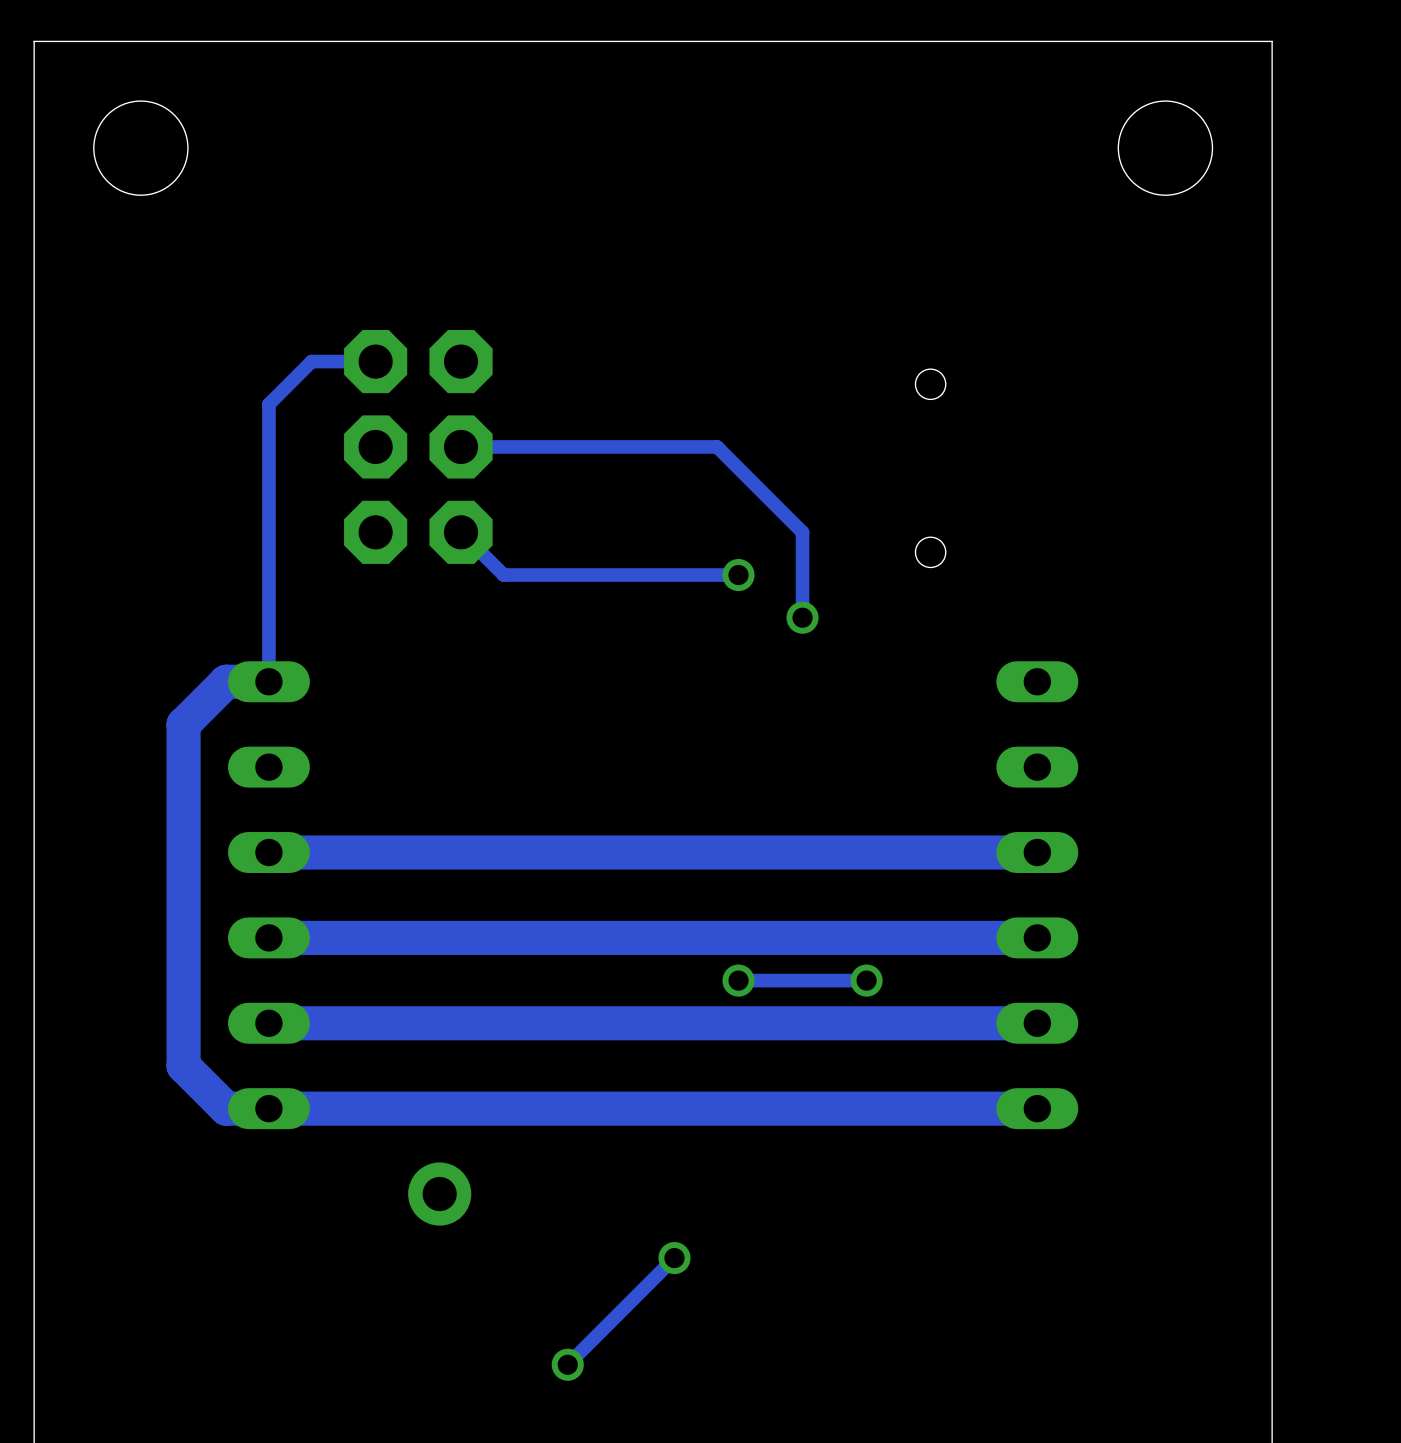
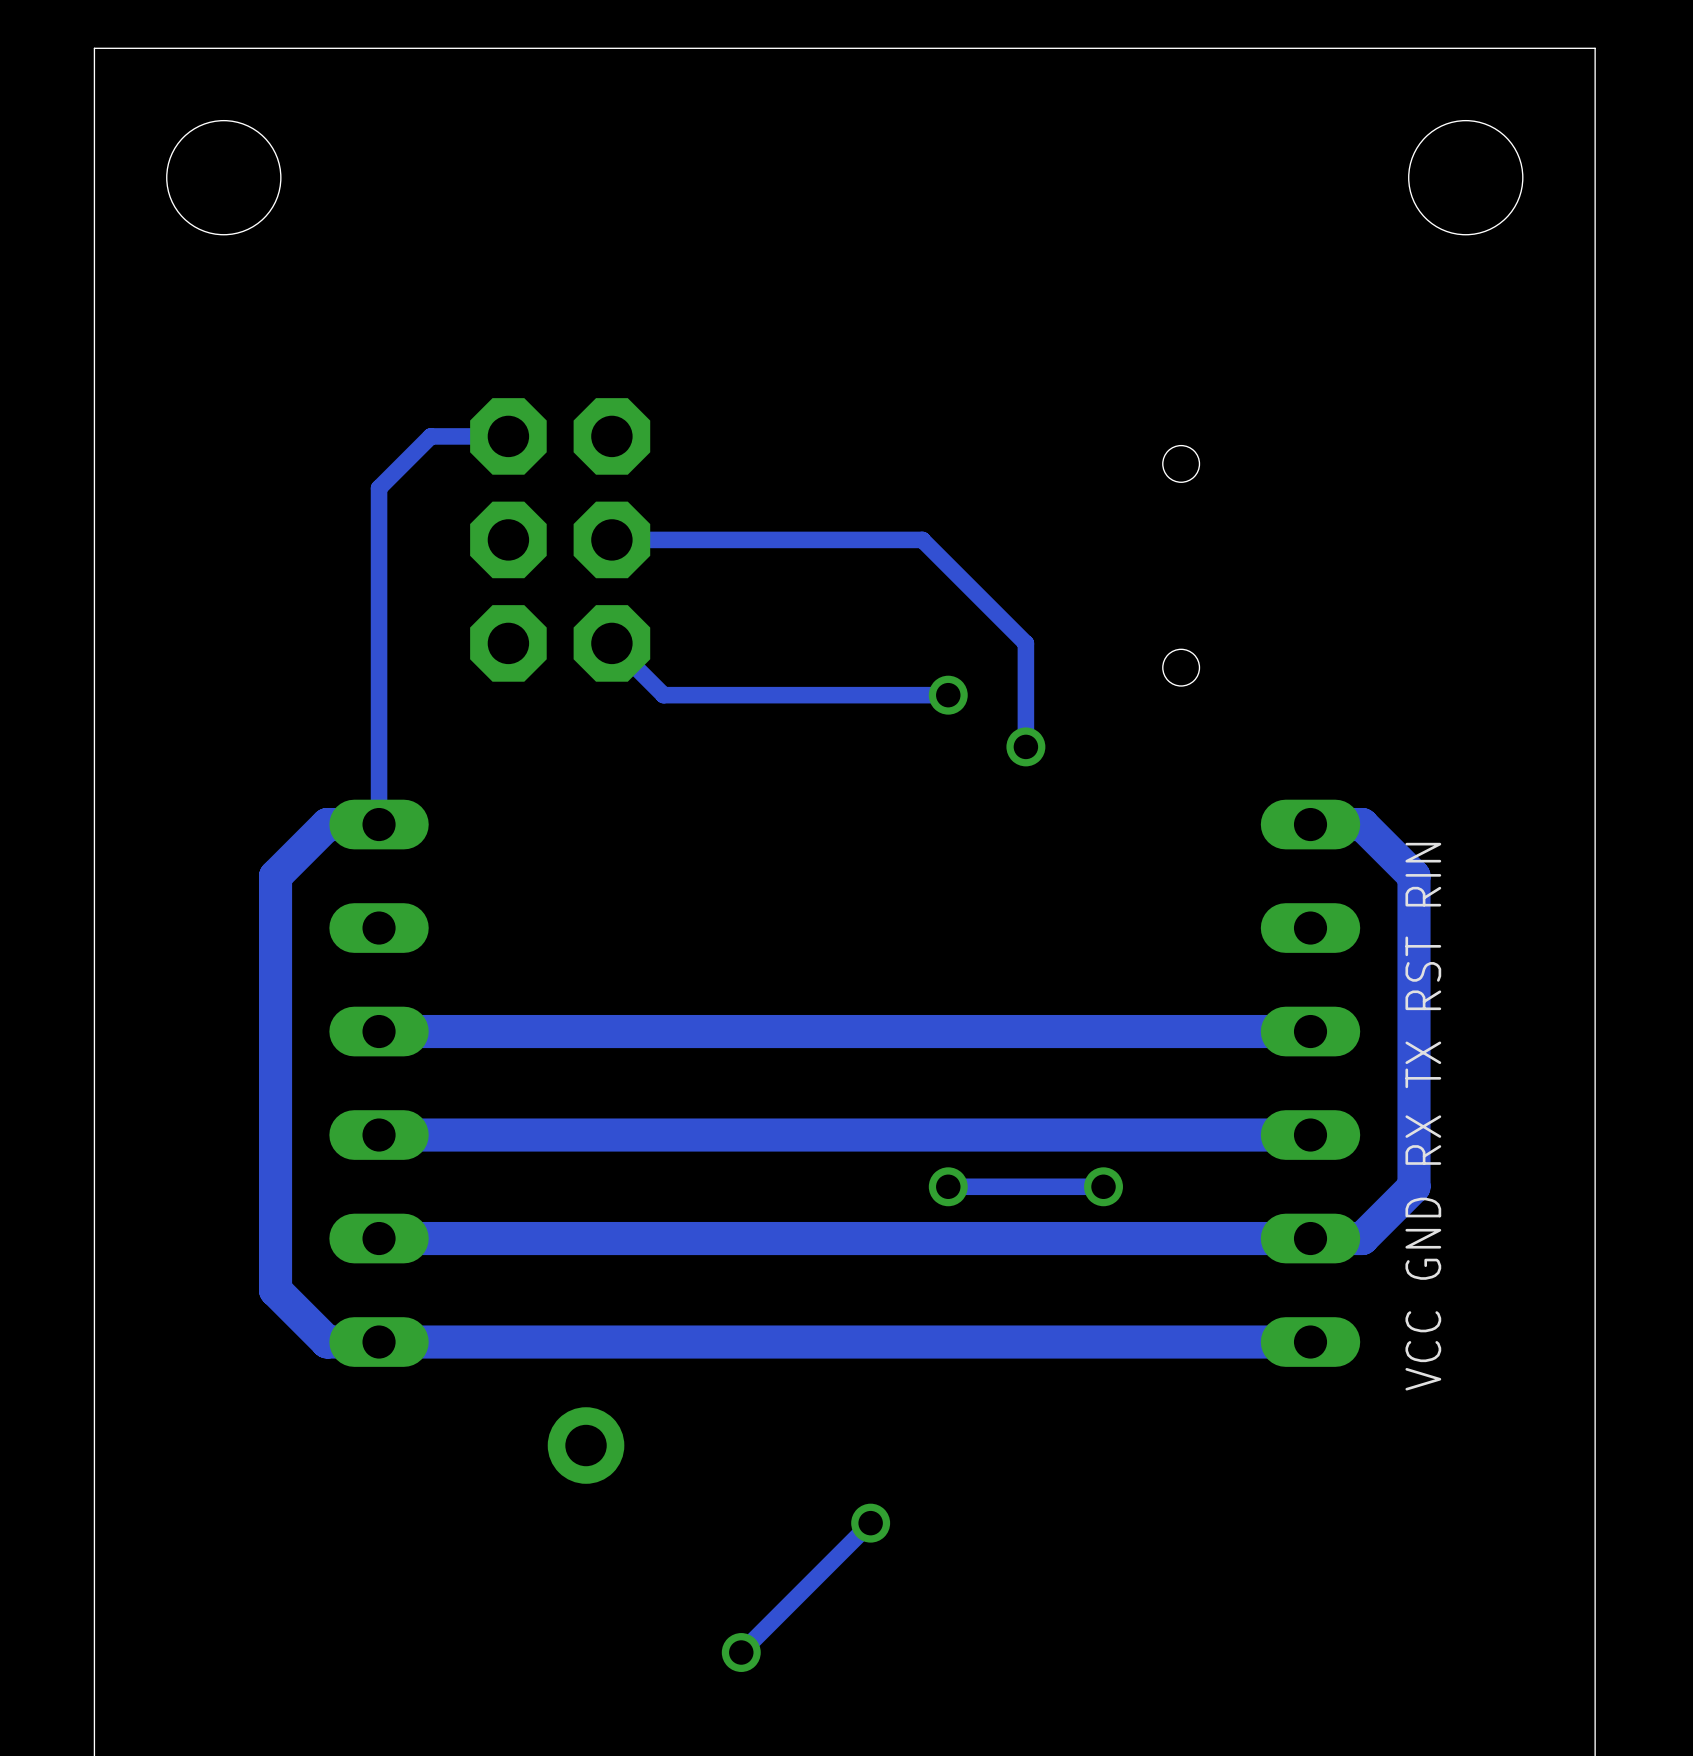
track width: thick (268, 681) (226, 681) (183, 724) (183, 1065) (226, 1108) (1037, 1108) -> thin (379, 824) (327, 824) (275, 876) (275, 1290) (327, 1342) (1310, 1342)
track: none -> (1310, 824) (1362, 824) (1414, 876) (1414, 1186) (1362, 1238) (1310, 1238)
track width: thick (1037, 852) (268, 852) -> thin (1310, 1031) (379, 1031)
text: none -> VCC GND RX TX RST RIN (1423, 1116)
track width: thick (1037, 937) (268, 937) -> thin (1310, 1135) (379, 1135)
track width: thick (1037, 1023) (268, 1023) -> thin (1310, 1238) (379, 1238)

